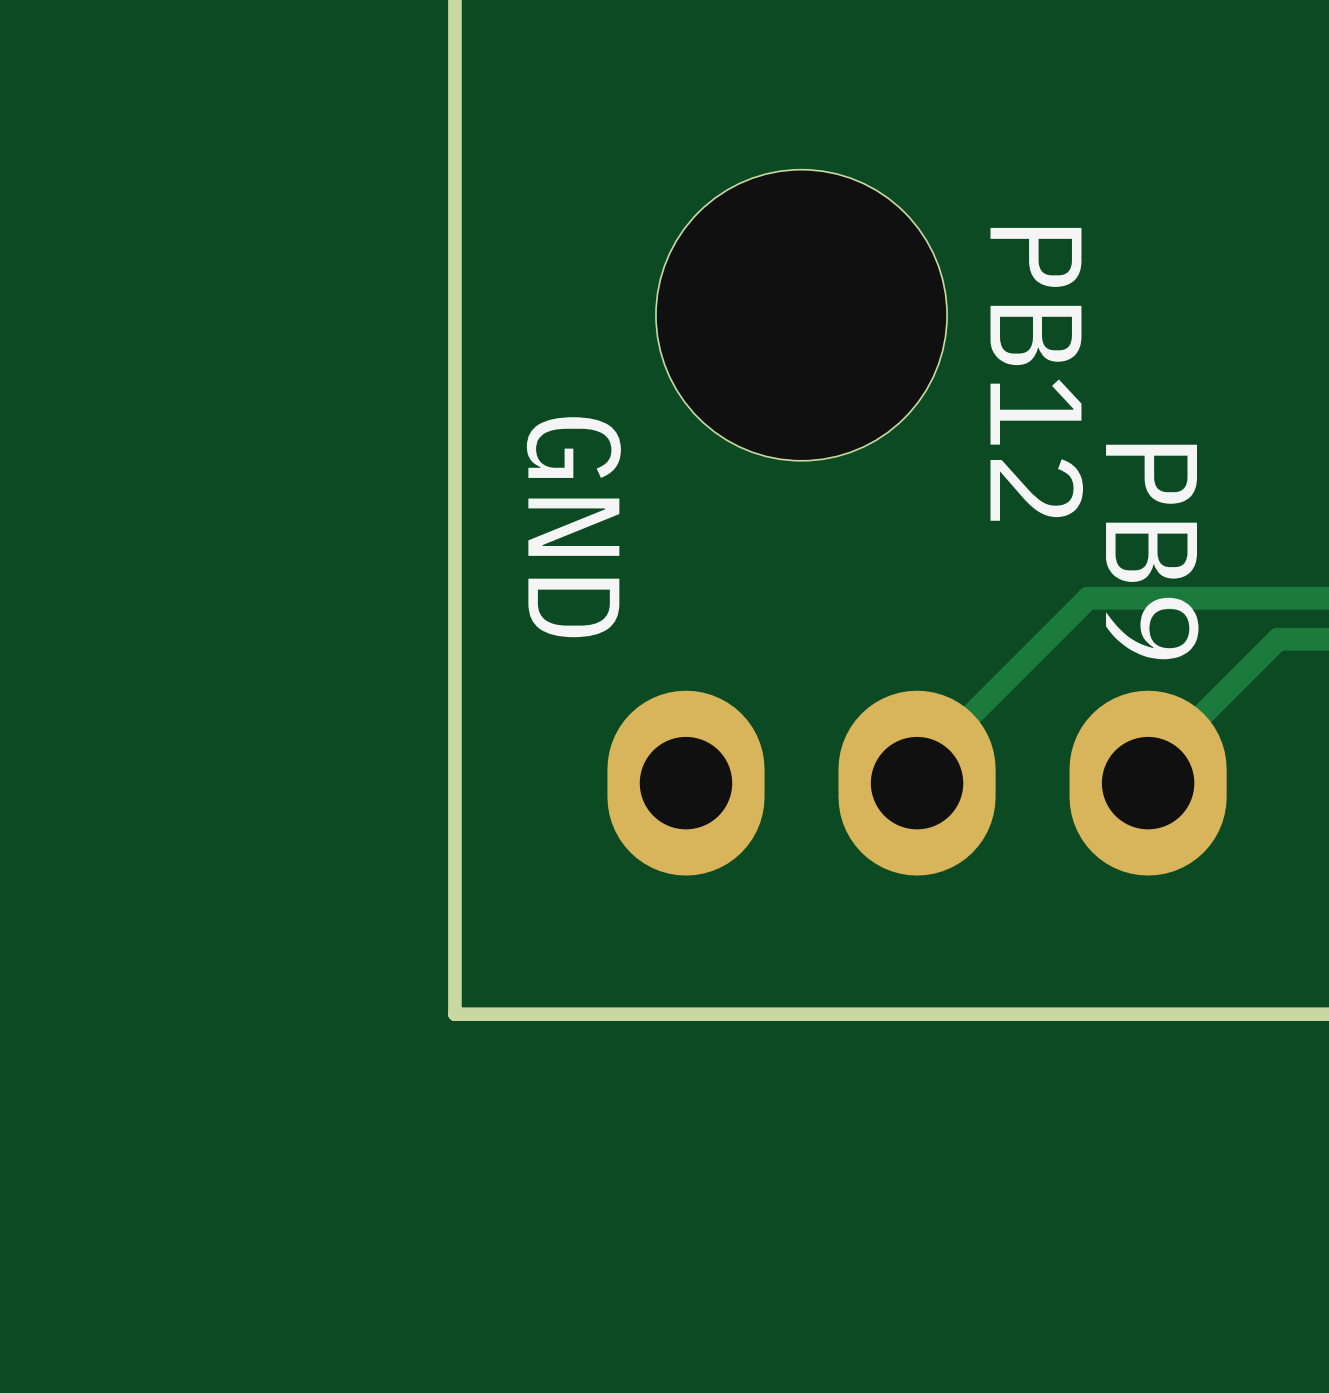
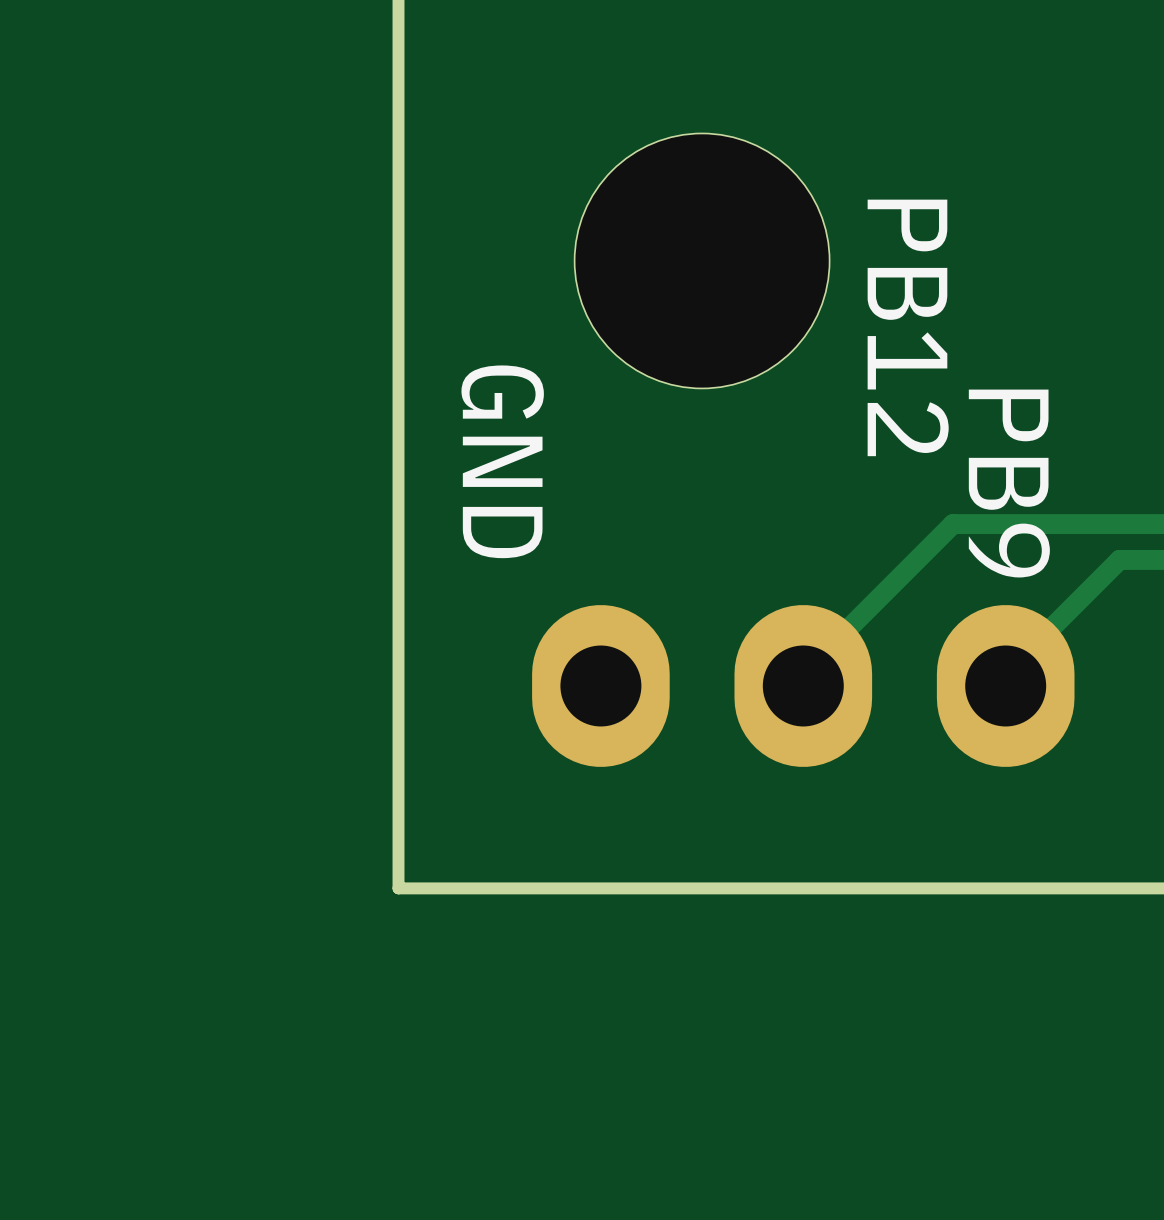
part position: (801, 315) -> (702, 260)

